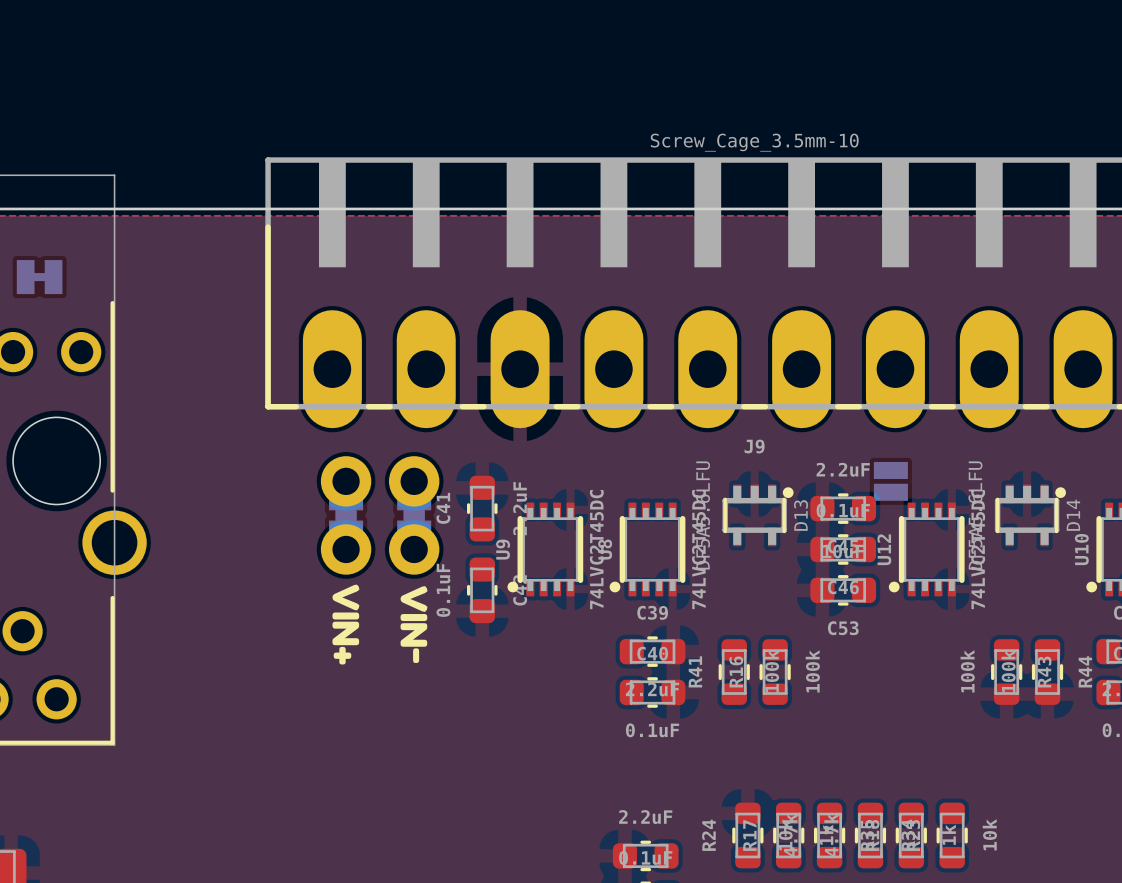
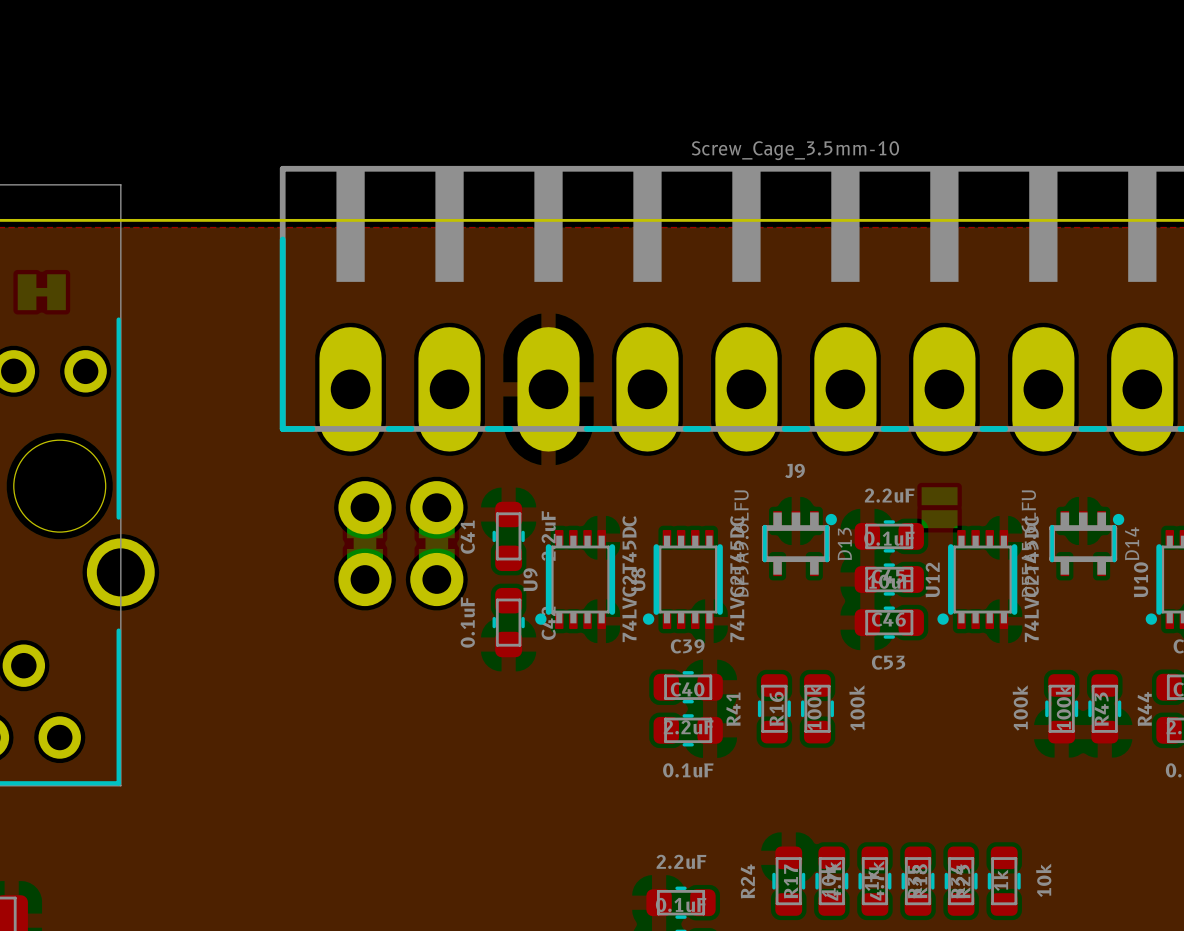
drawing: [332, 584, 360, 665] -> none
drawing: [400, 586, 428, 664] -> none

